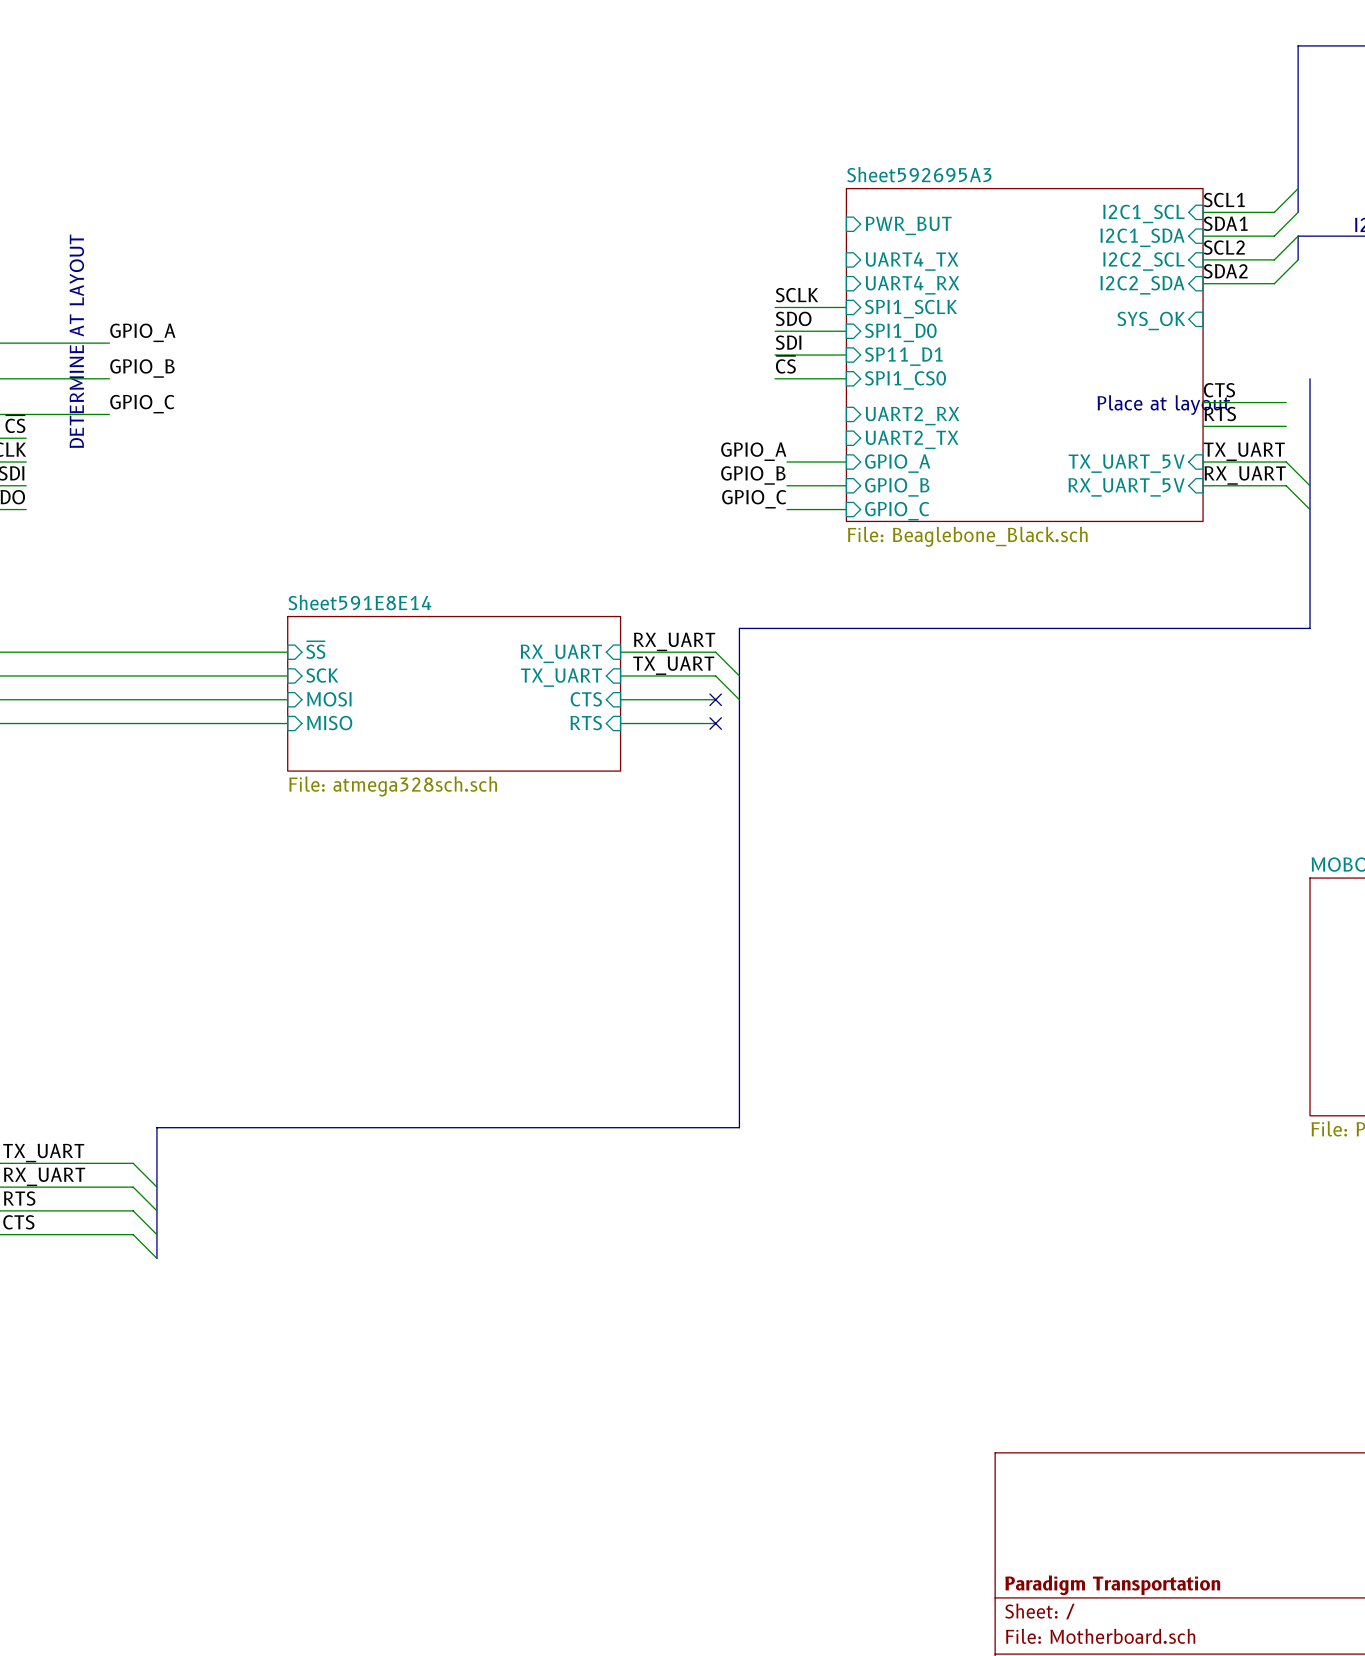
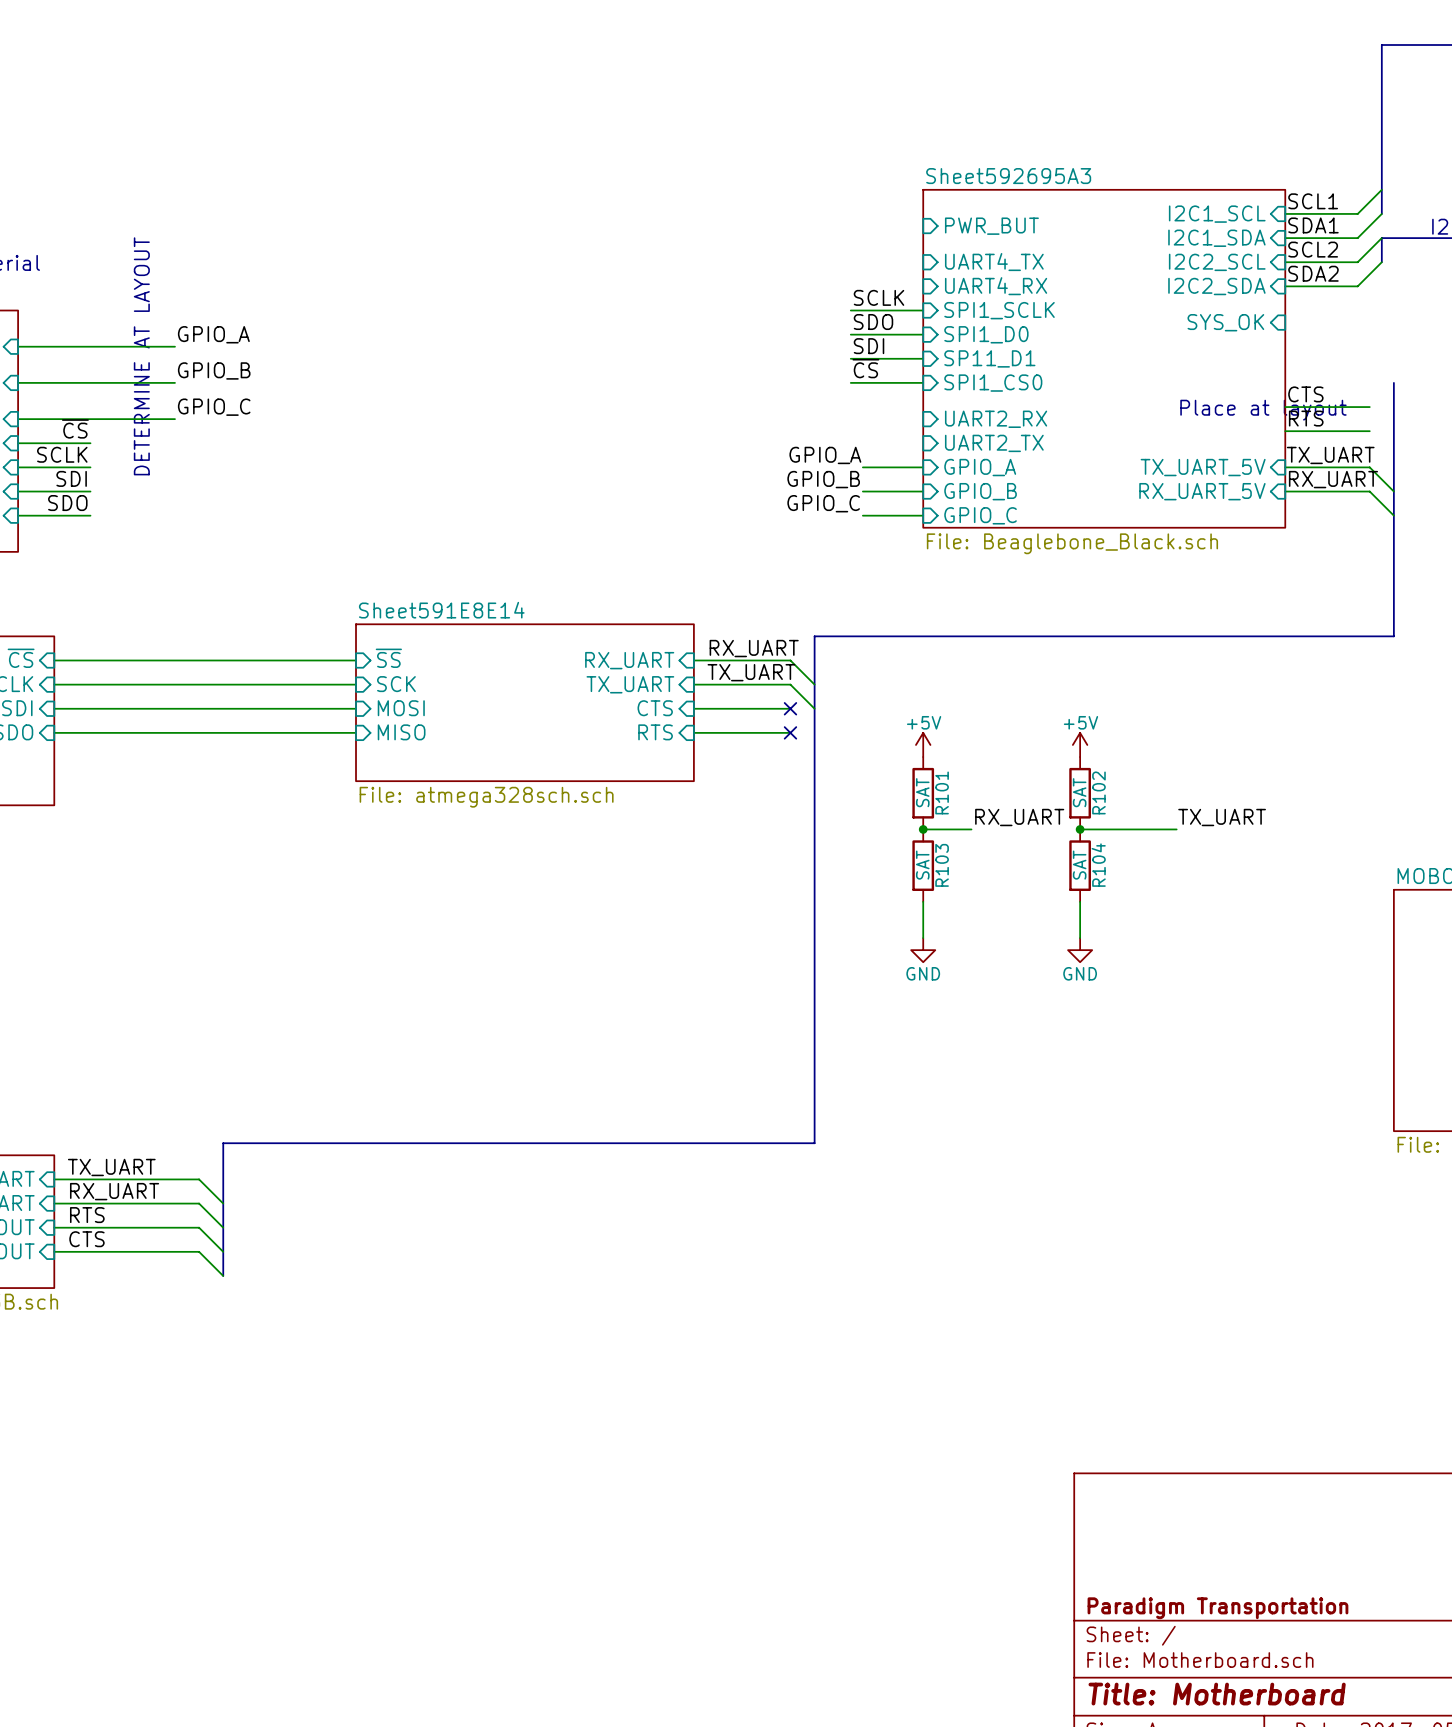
power symbol: none -> +5V (923, 744)
power symbol: none -> +5V (1080, 744)
R101: none -> SAT (923, 793)
R102: none -> SAT (1080, 793)
label: none -> RX_UART (1019, 817)
label: none -> TX_UART (1222, 817)
wire: none -> (923, 829) (971, 829)
junction: none -> (923, 829)
wire: none -> (1080, 829) (1176, 829)
junction: none -> (1080, 829)
R103: none -> SAT (923, 865)
R104: none -> SAT (1080, 865)
wire: none -> (923, 901) (923, 938)
wire: none -> (1080, 901) (1080, 938)
power symbol: none -> GND (923, 950)
power symbol: none -> GND (1080, 950)

